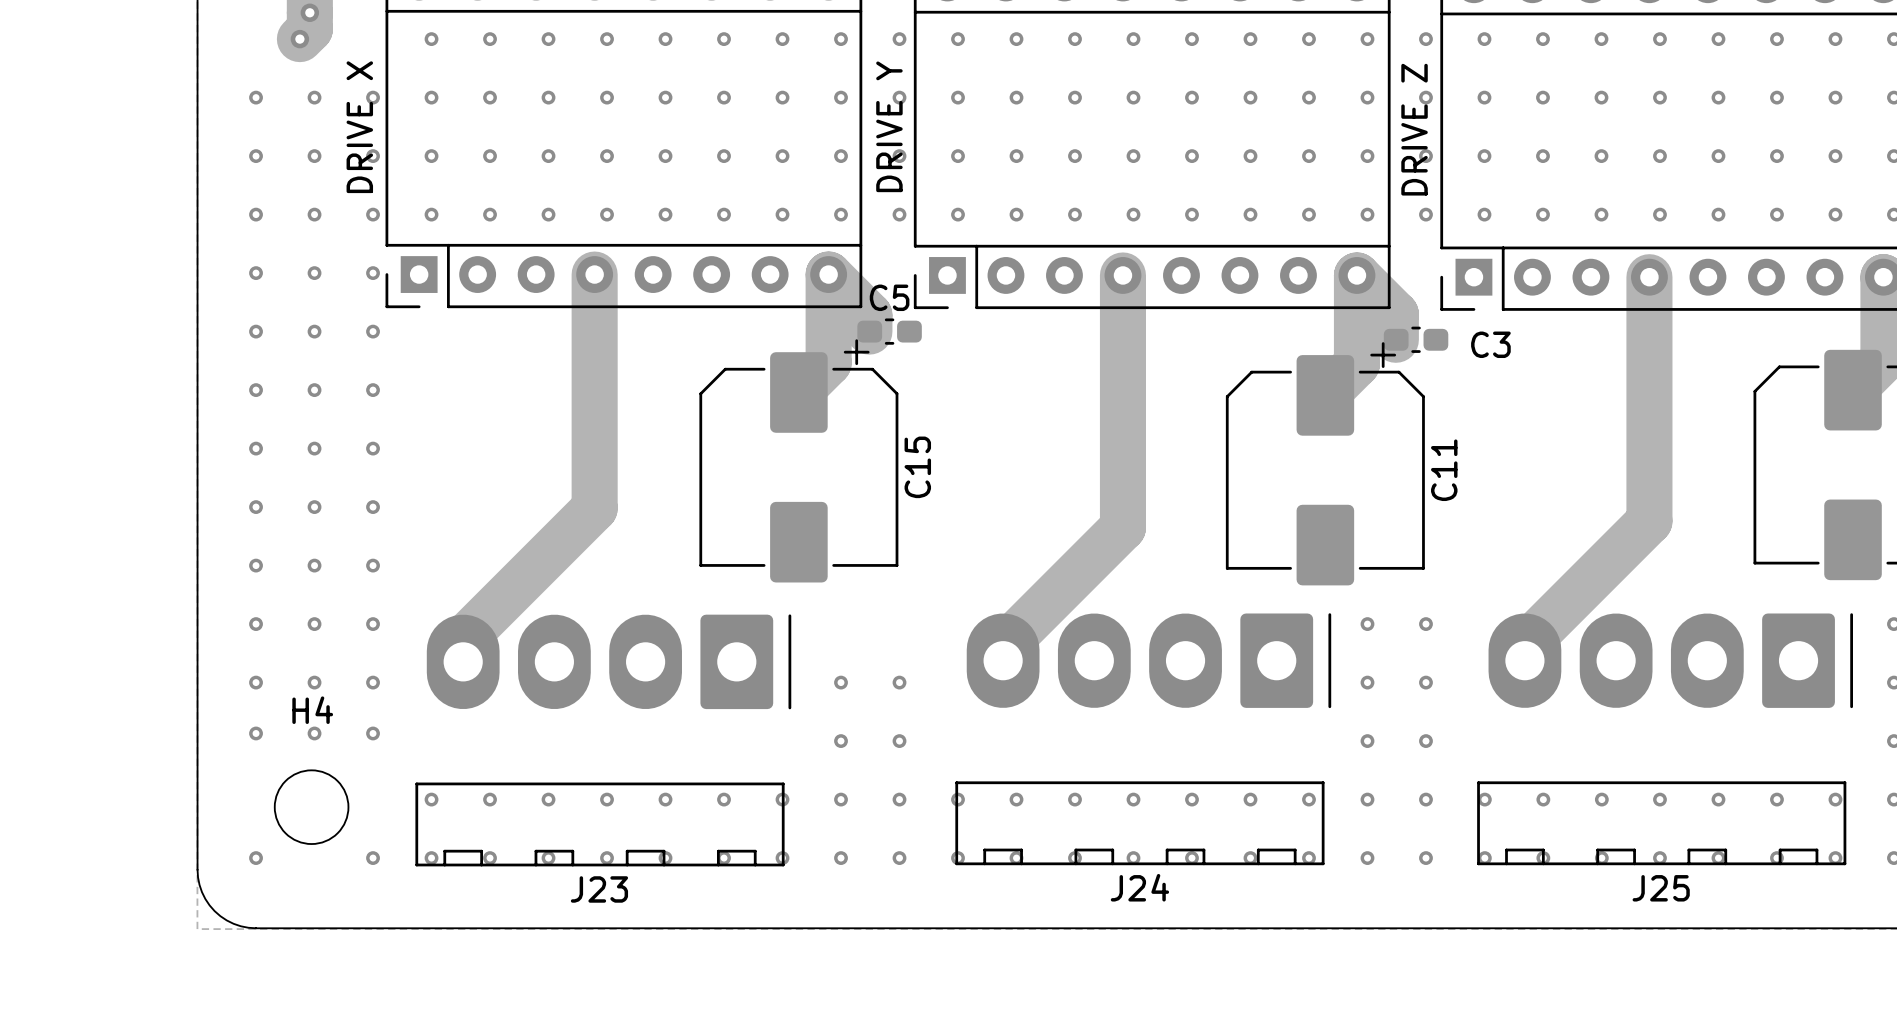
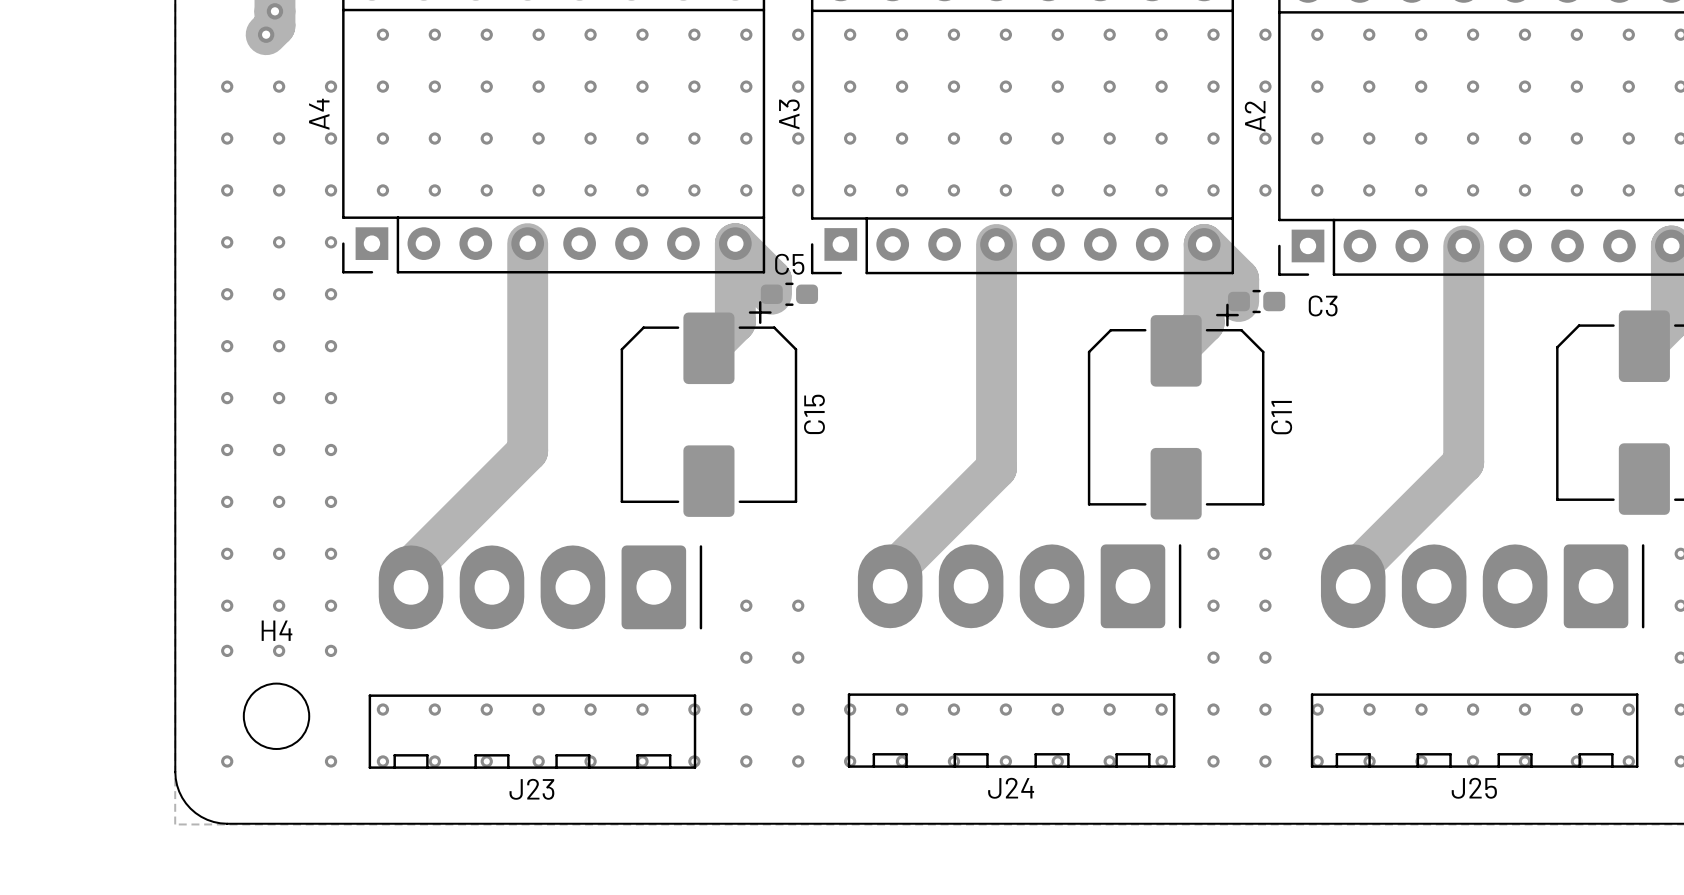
DRIVE Y name: DRIVE Y (889, 126) -> A3 (789, 114)
DRIVE X name: DRIVE X (359, 127) -> A4 (319, 114)
DRIVE Z name: DRIVE Z (1414, 129) -> A2 (1255, 116)

